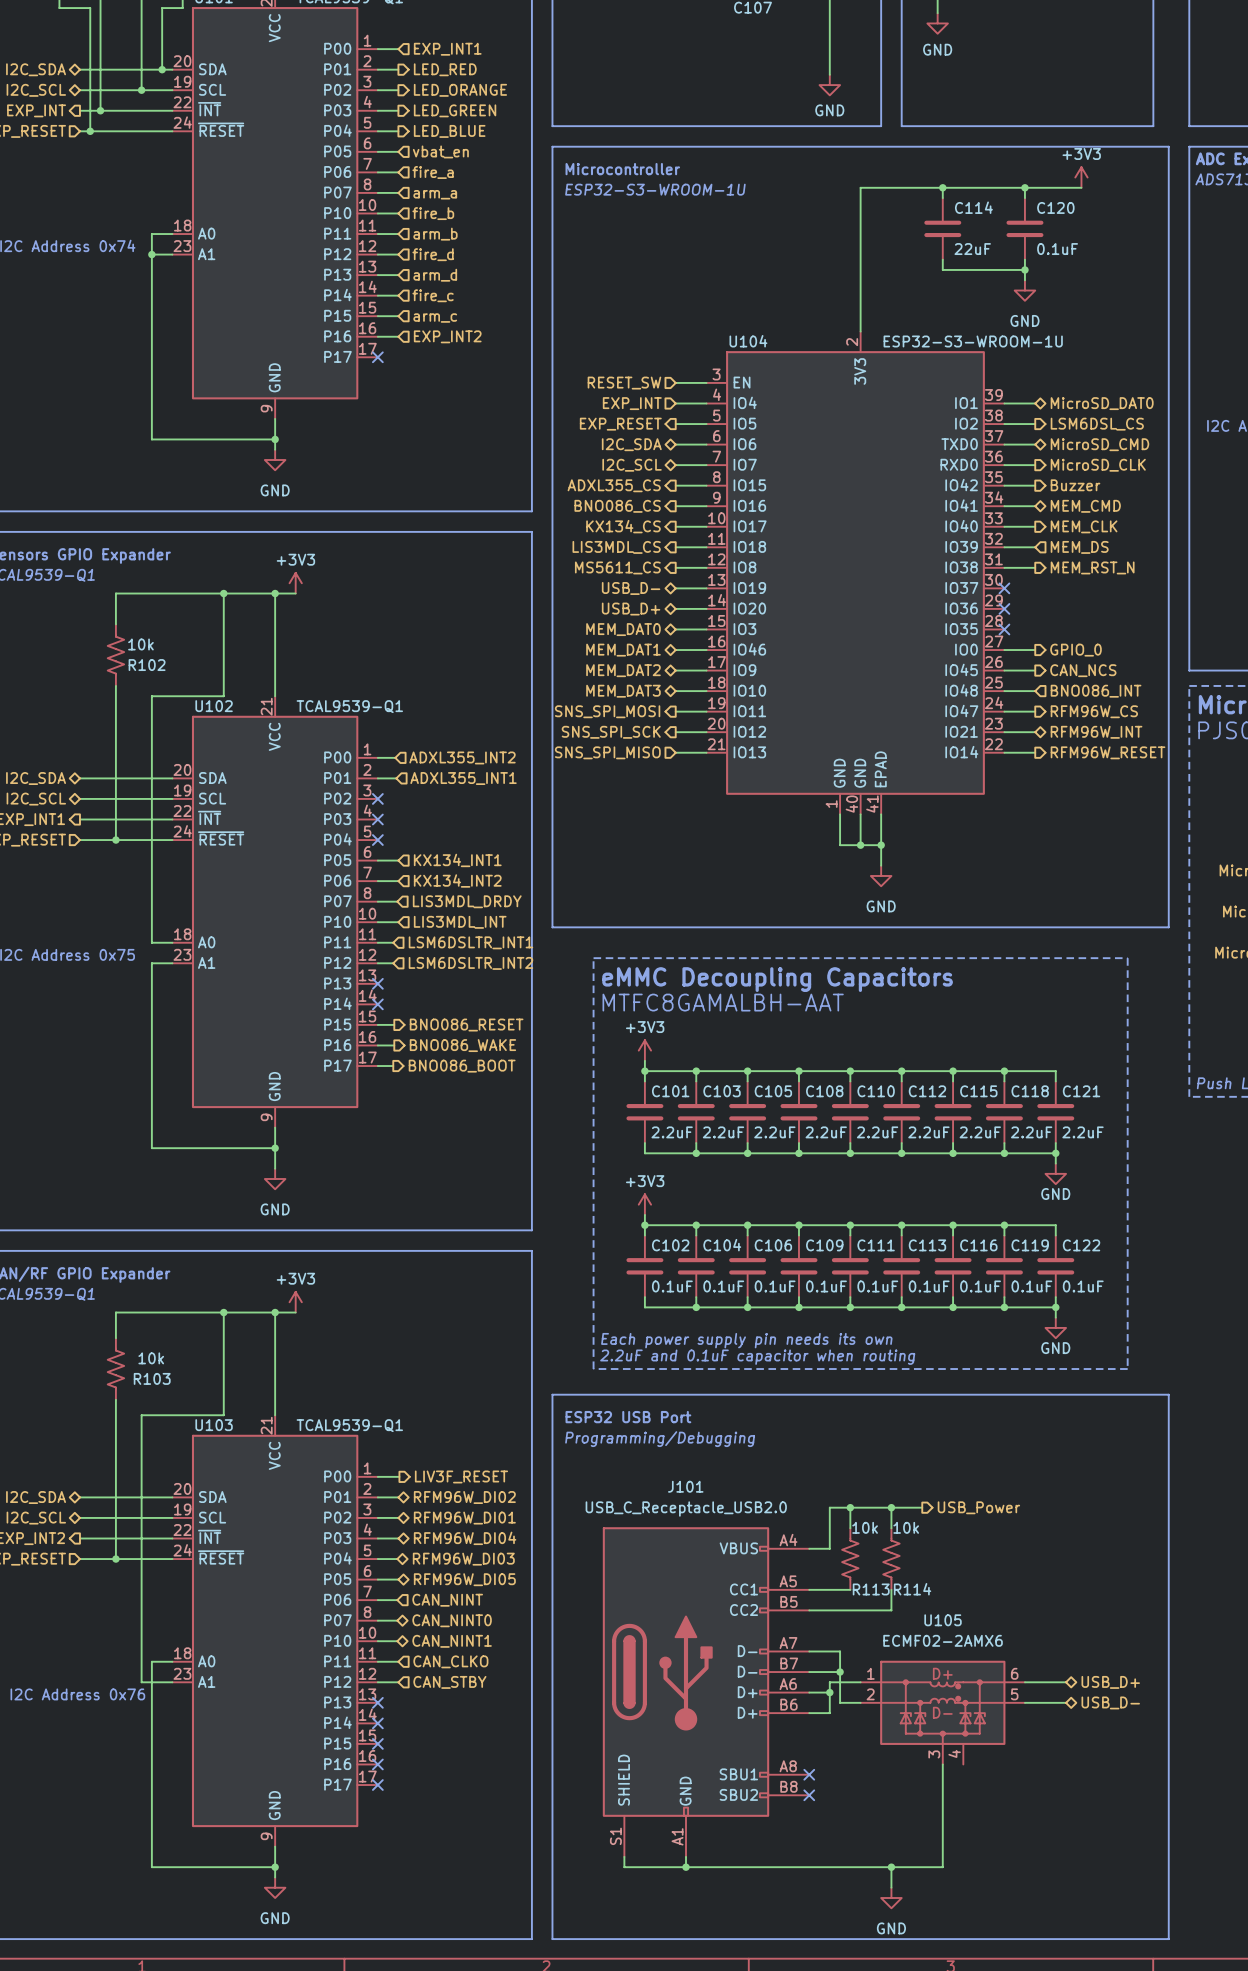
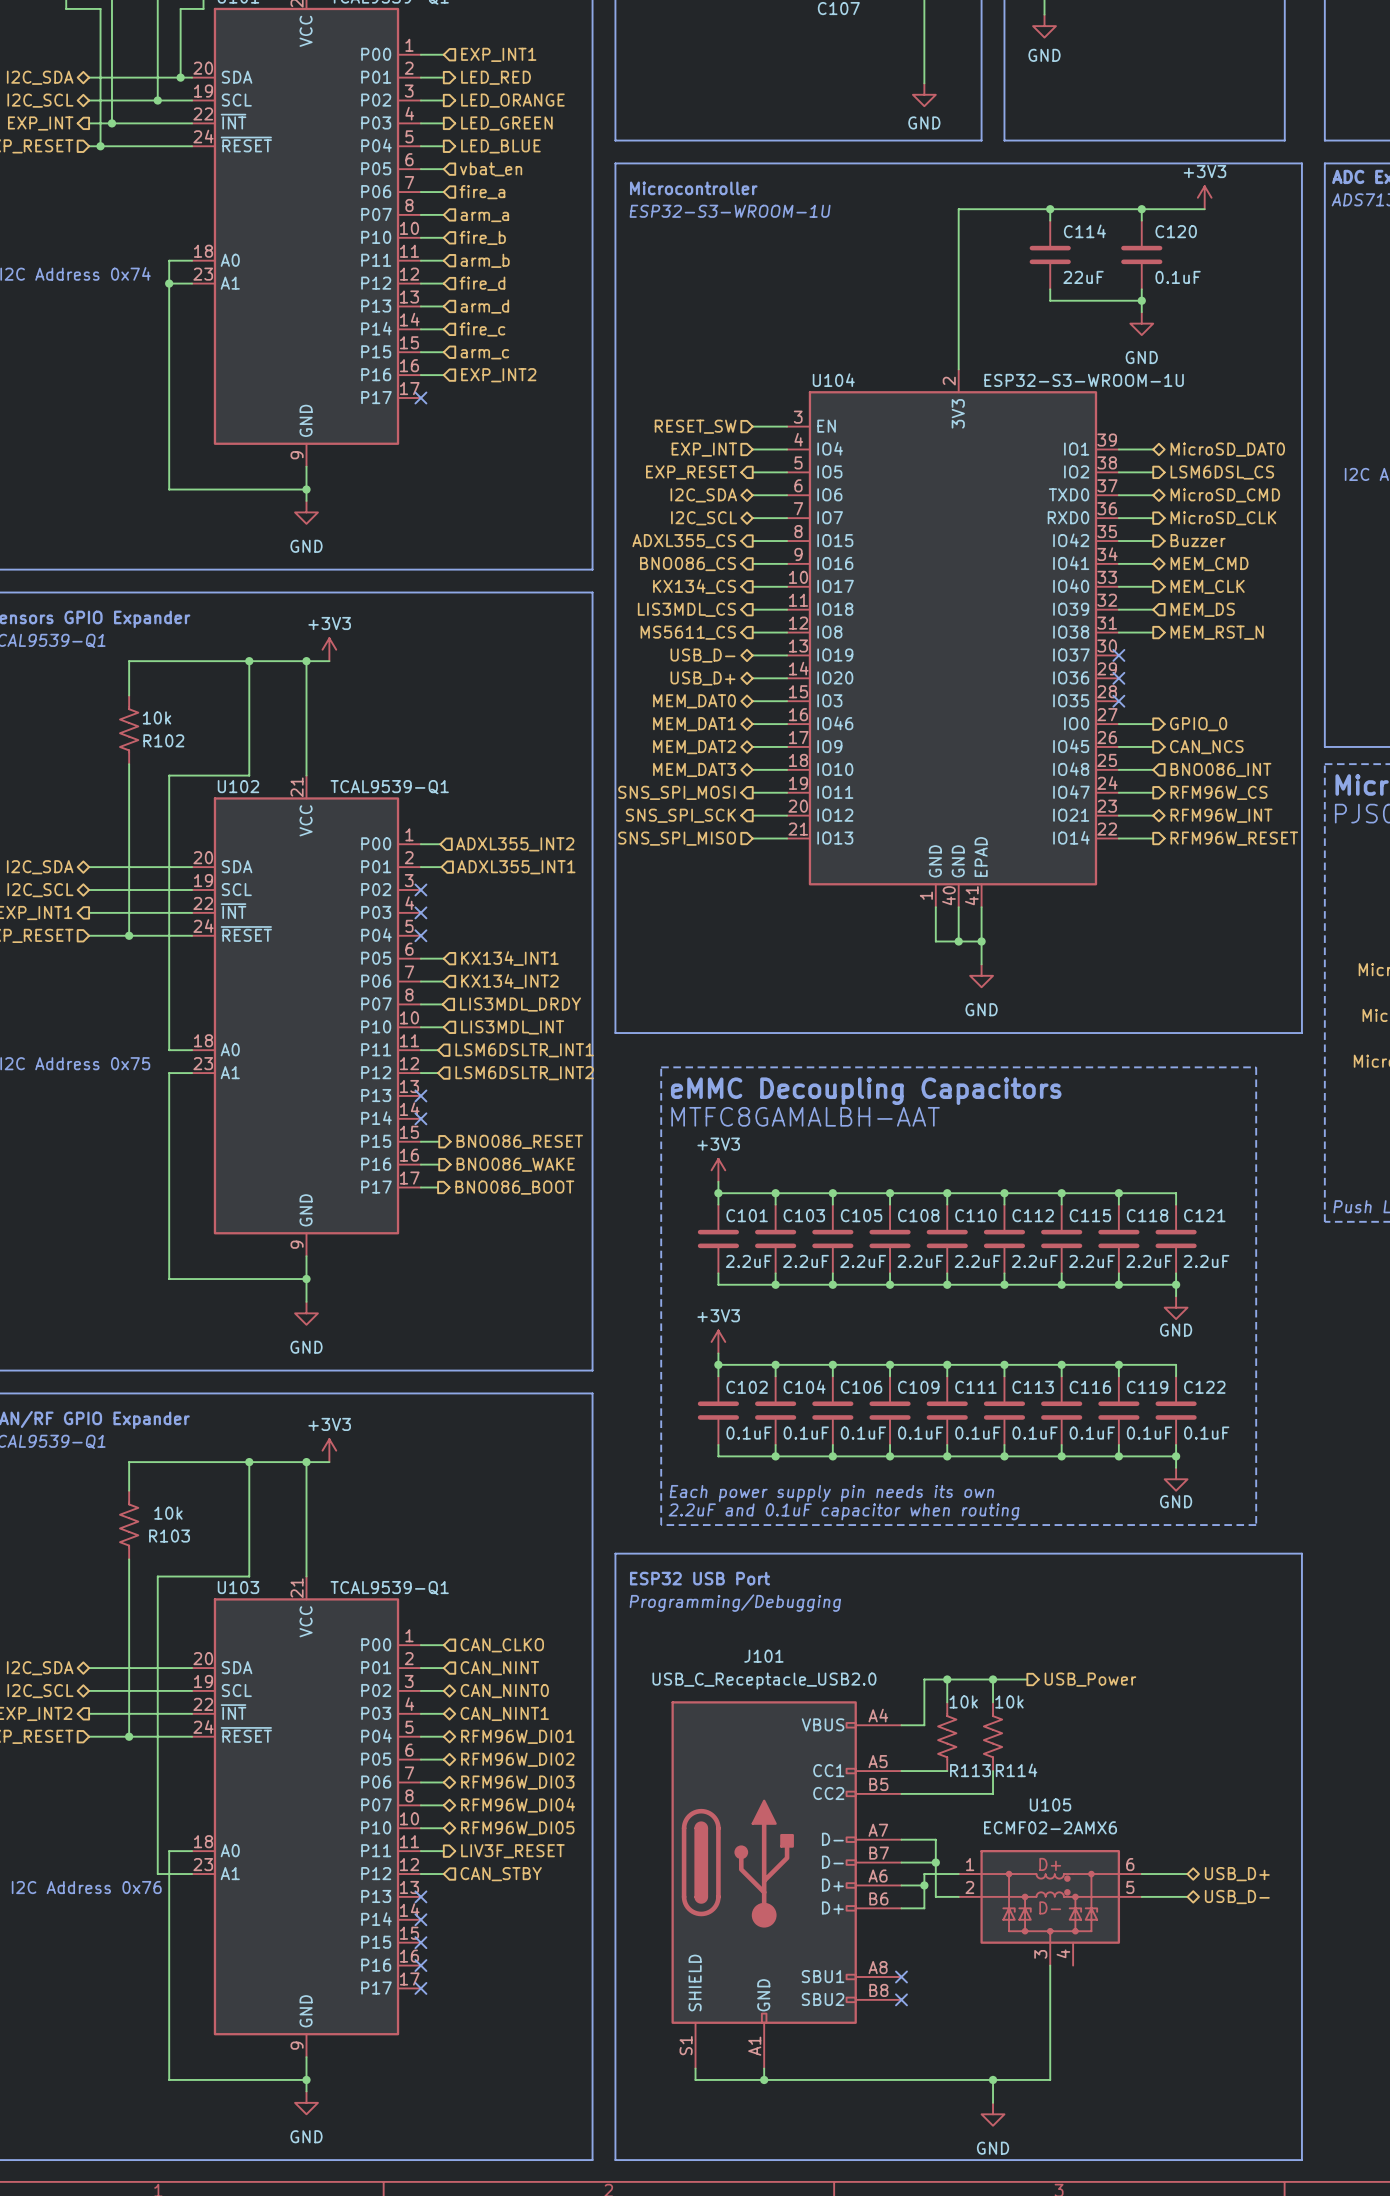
hierarchical label shape: output (461, 1476) -> input (502, 1645)
hierarchical label: LIV3F_RESET (461, 1476) -> CAN_CLKO (502, 1645)
hierarchical label shape: bidirectional (464, 1497) -> input (499, 1668)
hierarchical label: RFM96W_DI02 (464, 1497) -> CAN_NINT (499, 1668)
hierarchical label: RFM96W_DI01 (464, 1518) -> CAN_NINT0 (504, 1691)
hierarchical label: RFM96W_DI04 (465, 1538) -> CAN_NINT1 (504, 1713)
hierarchical label position: RFM96W_DI03 (463, 1559) -> RFM96W_DI03 (517, 1782)
hierarchical label: none -> RFM96W_DI01 (517, 1736)
hierarchical label: RFM96W_DI05 (464, 1579) -> RFM96W_DI02 (517, 1759)
hierarchical label: CAN_NINT (447, 1600) -> none
hierarchical label: CAN_NINT0 (452, 1620) -> RFM96W_DI04 (518, 1805)
hierarchical label: CAN_NINT1 (452, 1641) -> RFM96W_DI05 (517, 1828)
hierarchical label shape: input (450, 1661) -> output (512, 1851)
hierarchical label: CAN_CLKO (450, 1661) -> LIV3F_RESET (512, 1851)

